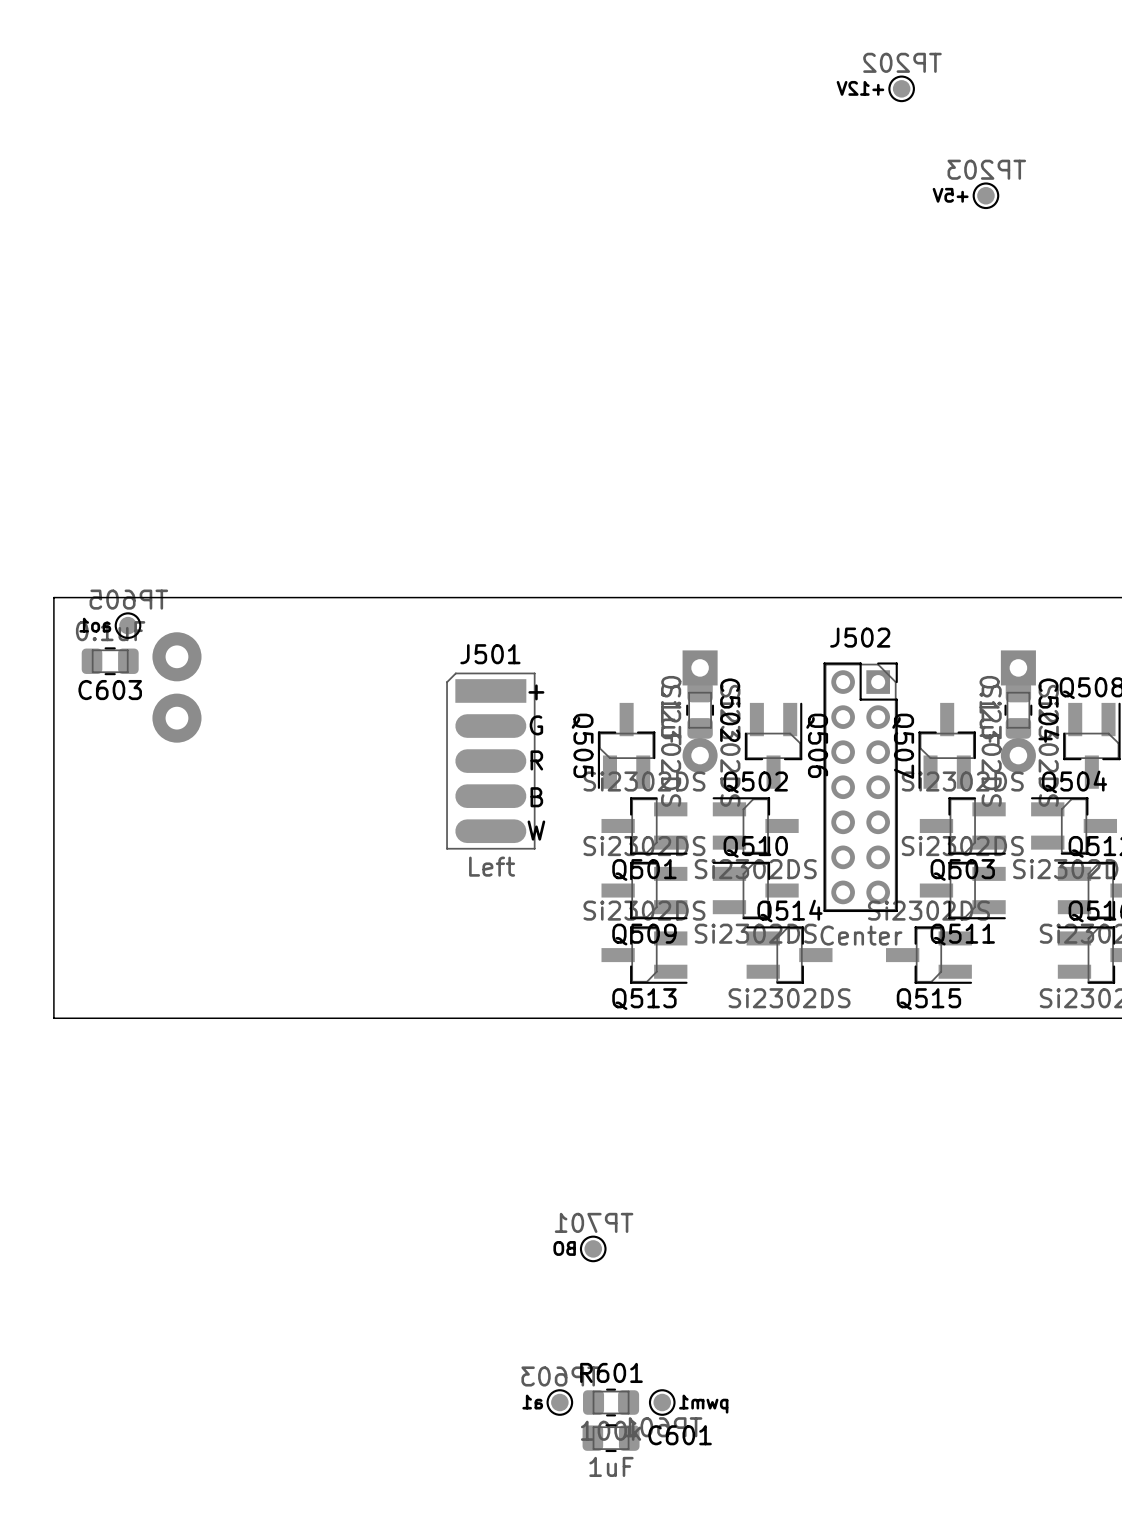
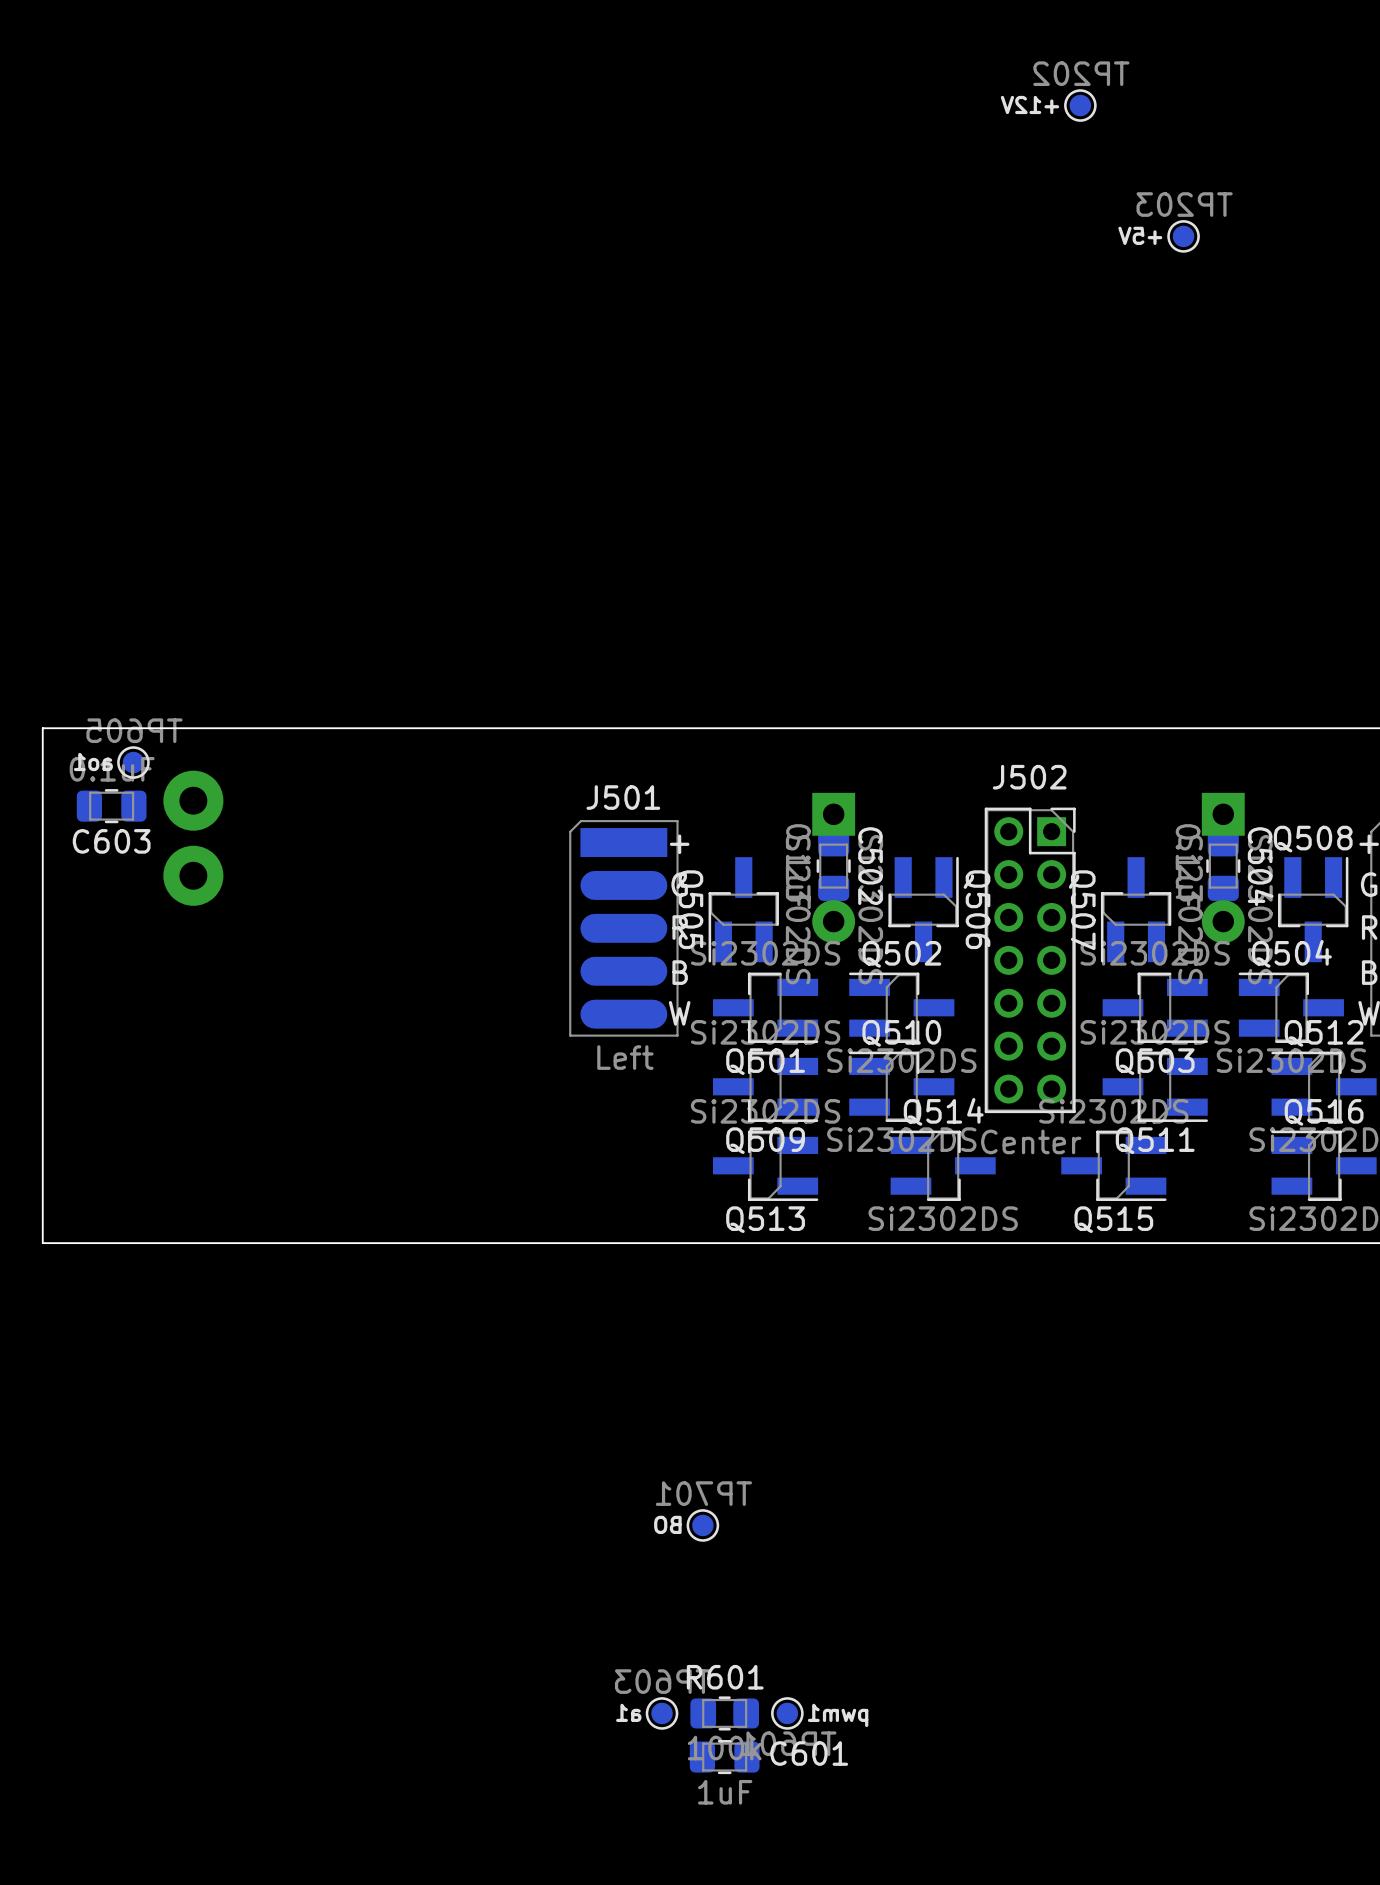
J501 position: (490, 761) -> (623, 928)

